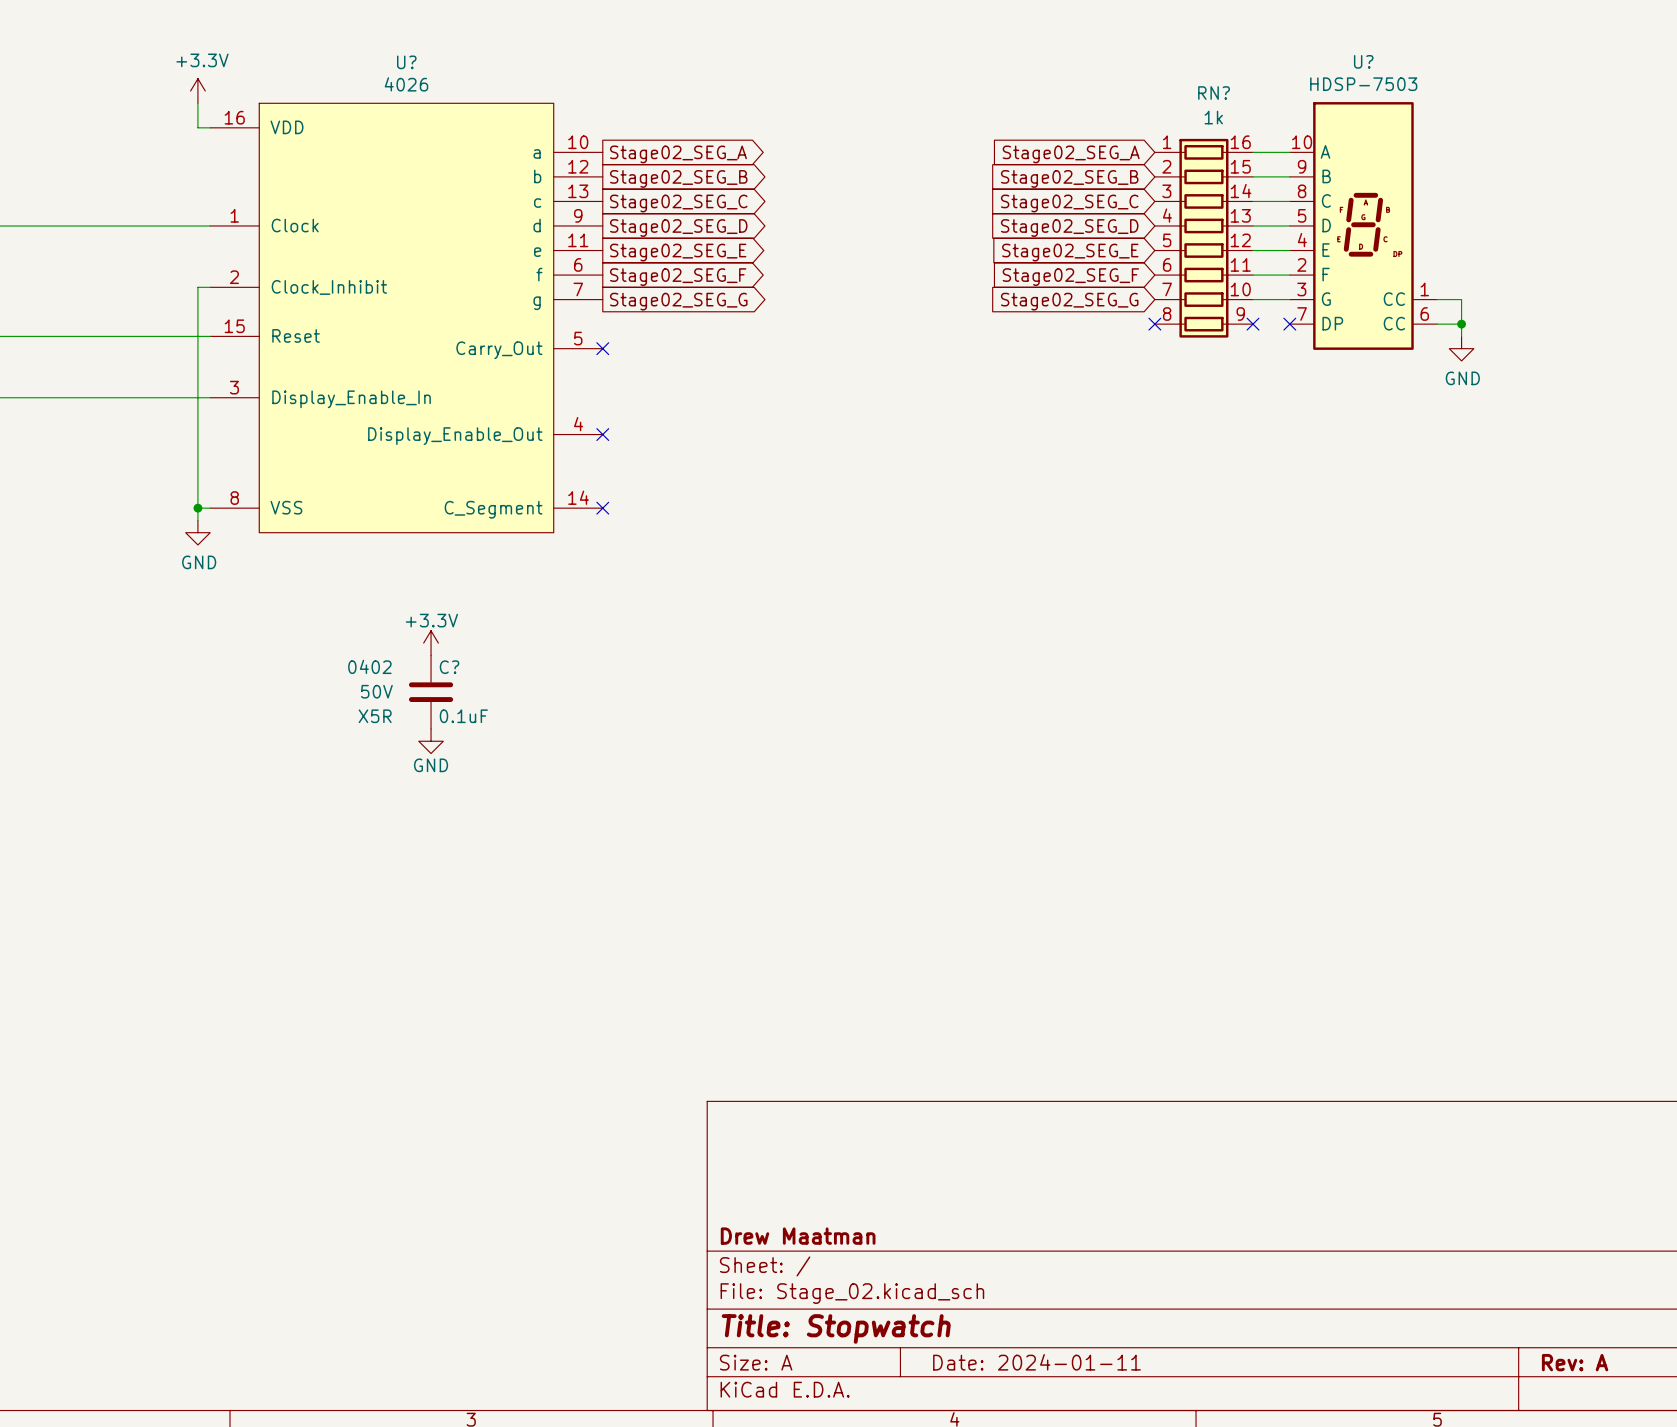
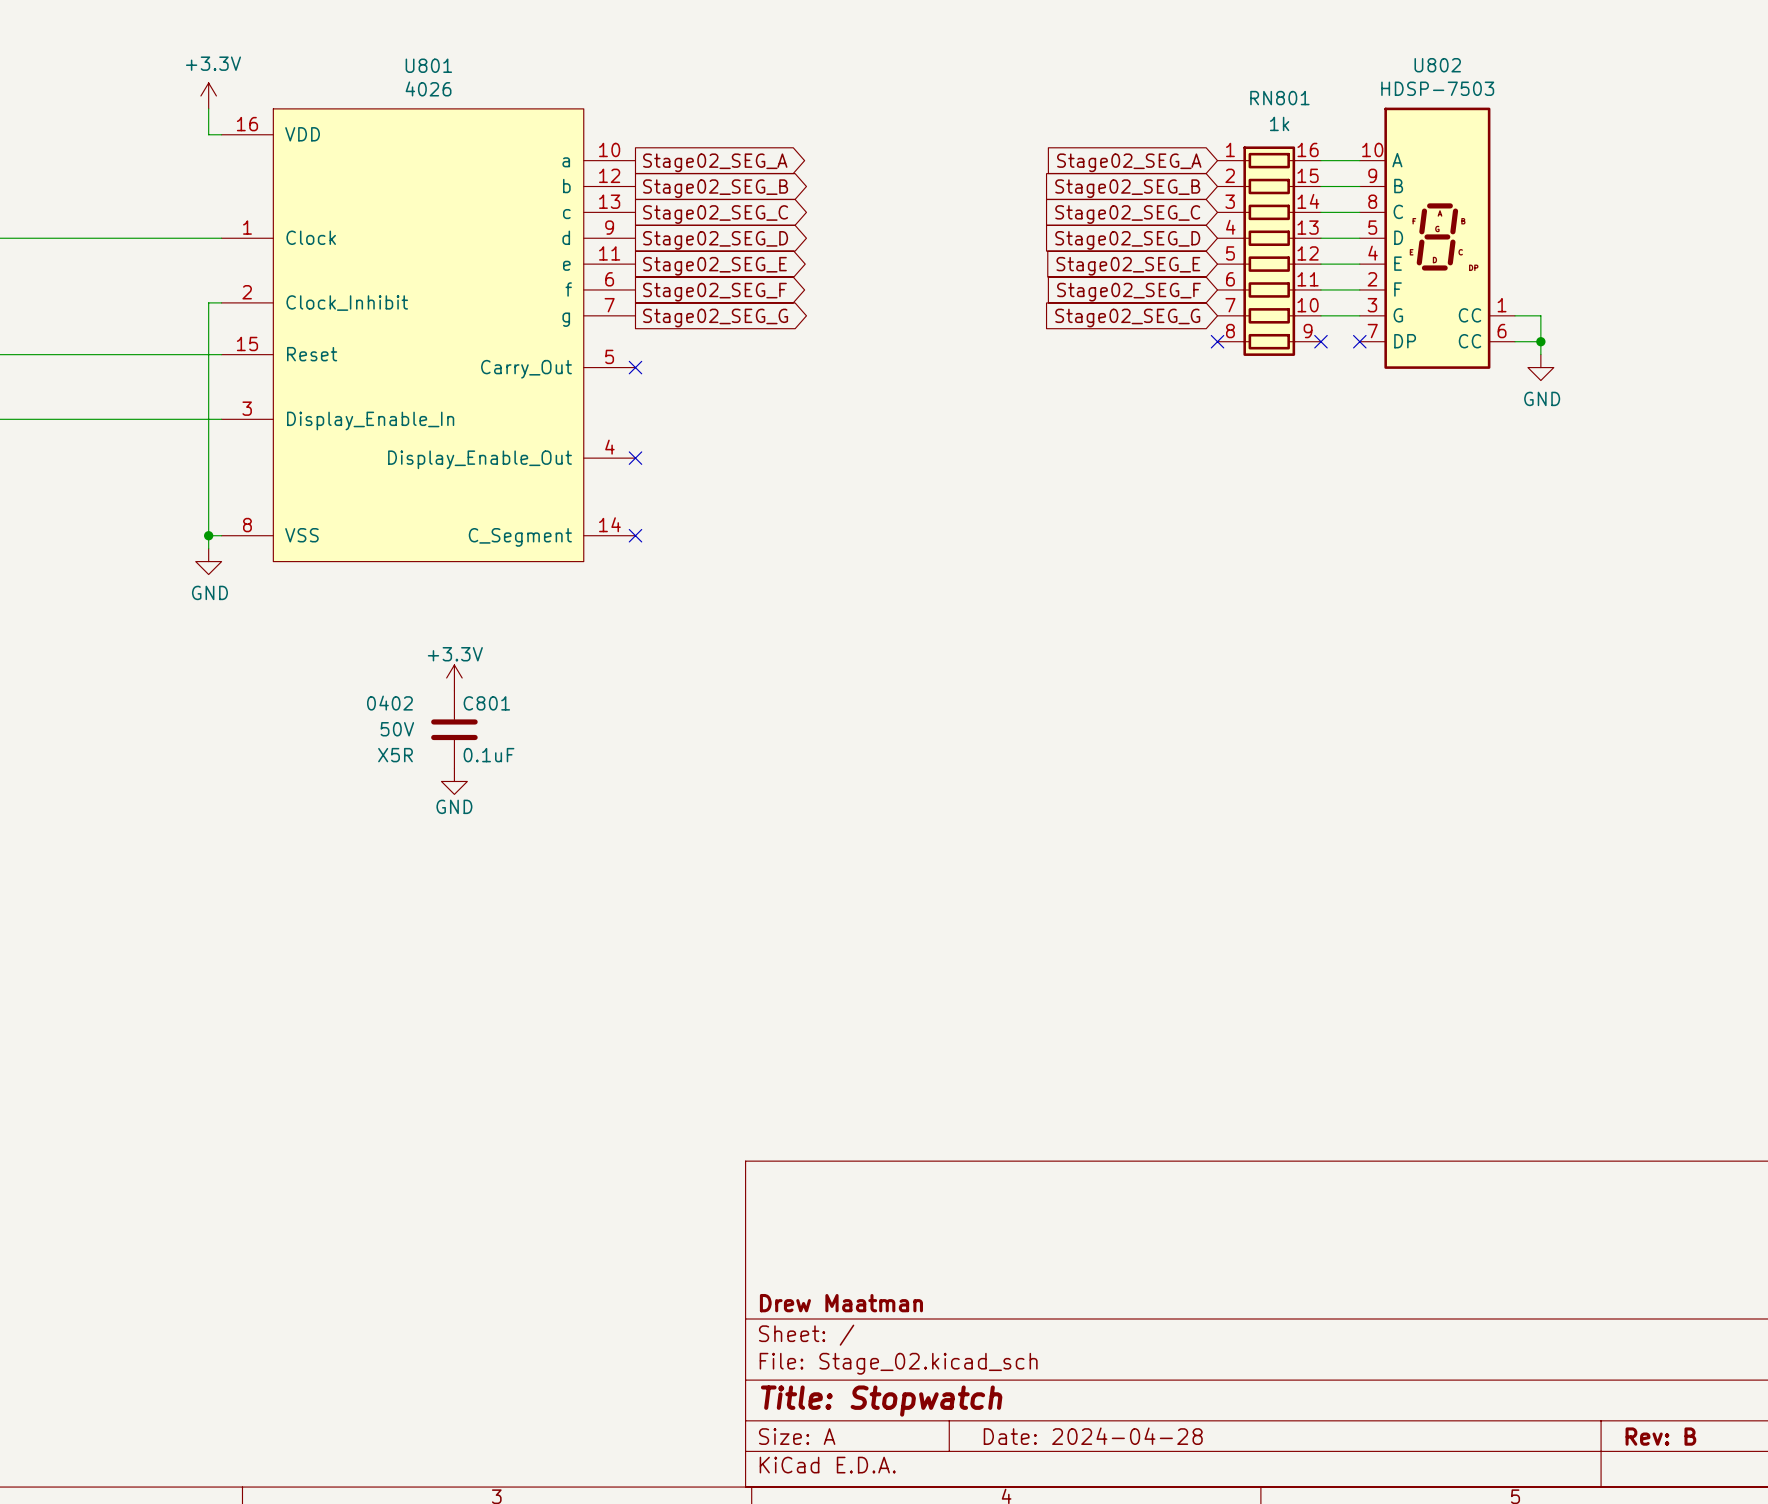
U? name: U? (1363, 61) -> U802 (1437, 65)
U? name: U? (406, 62) -> U801 (428, 65)
RN? name: RN? (1214, 93) -> RN801 (1279, 98)
C? name: C? (449, 667) -> C801 (486, 703)
title block: Date: 2024-01-11 (1036, 1362) -> Date: 2024-04-28 (1093, 1436)
title block: Rev: A (1575, 1362) -> Rev: B (1660, 1436)

